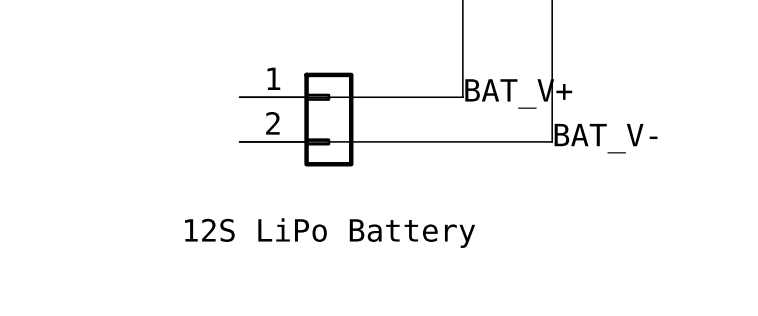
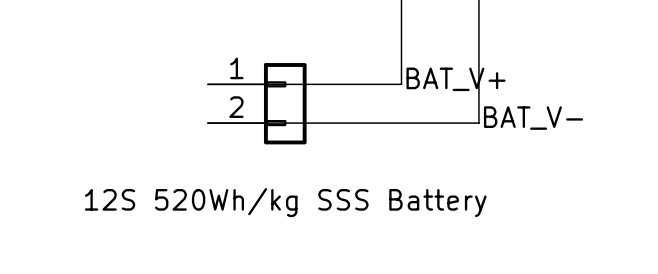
part value: 12S LiPo Battery (330, 233) -> 12S 520Wh/kg SSS Battery (285, 202)

